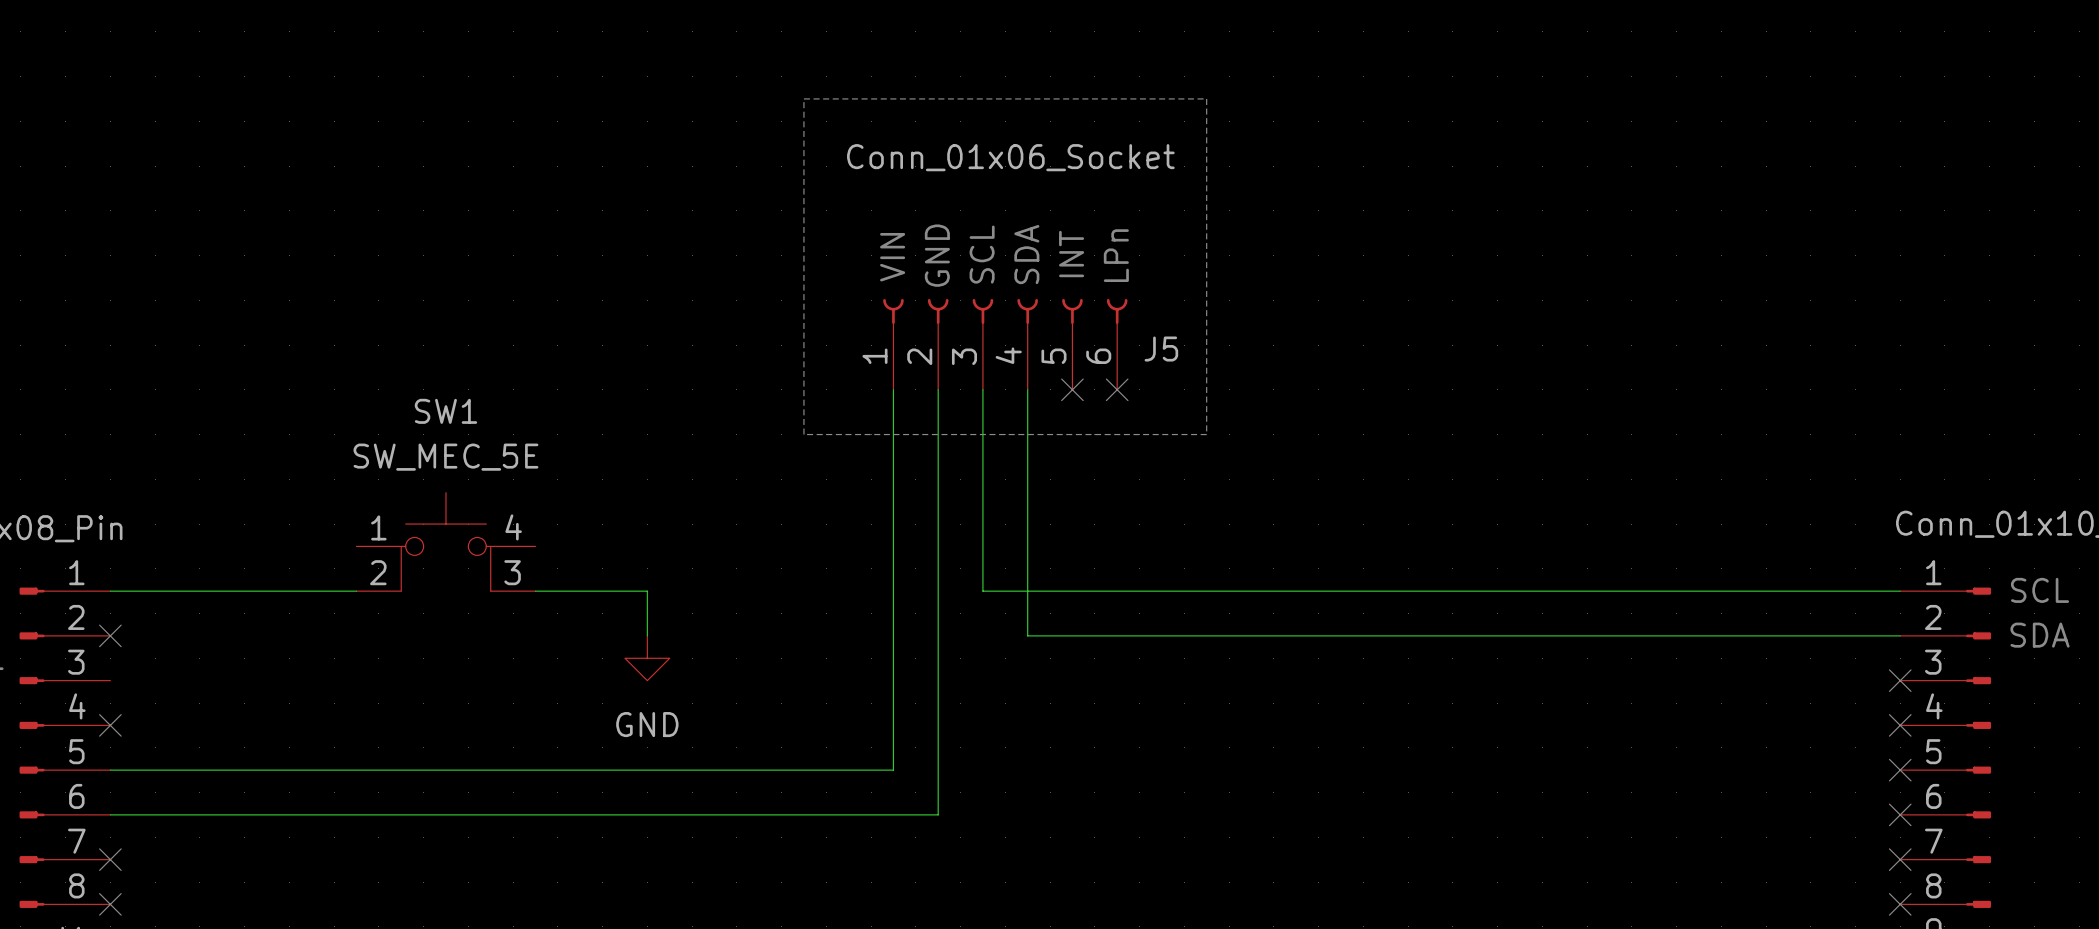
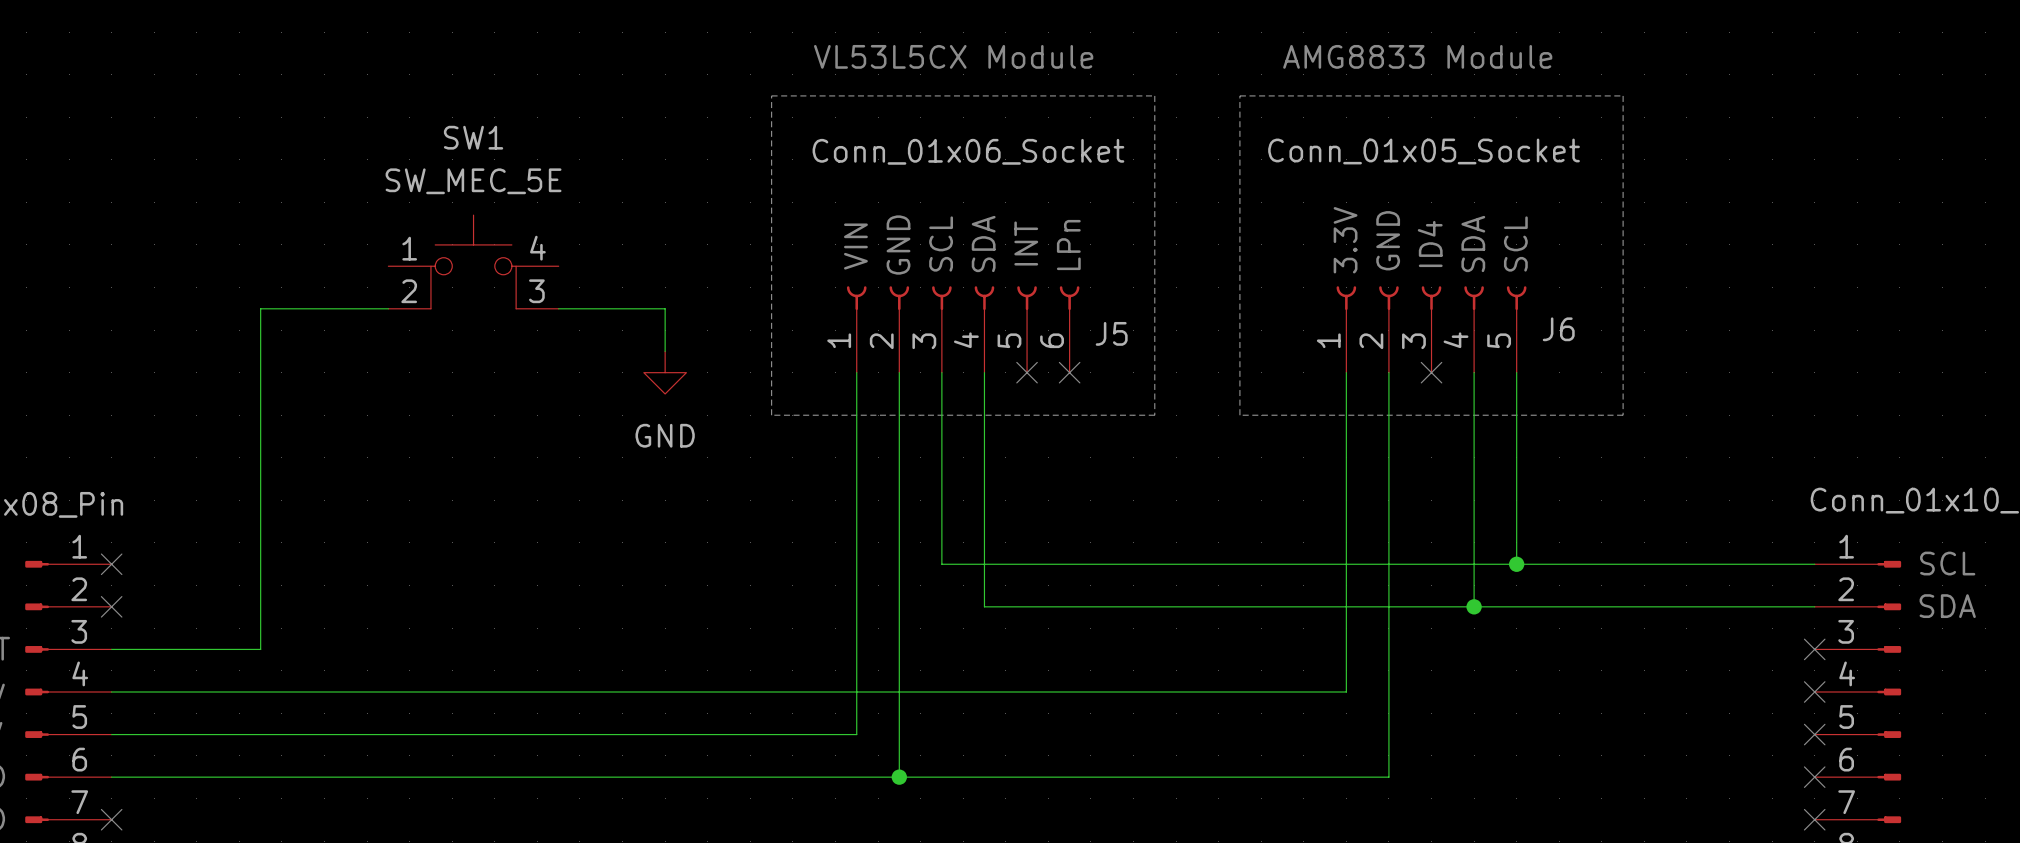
text: none -> VL53L5CX Module (953, 56)
text: none -> AMG8833 Module (1417, 56)
line: none -> (1239, 95) (1623, 95) (1623, 415) (1239, 415) (1239, 95)
text: none -> 3.3V (1345, 240)
text: none -> GND (1388, 240)
text: none -> ID4 (1430, 243)
text: none -> SDA (1473, 243)
text: none -> SCL (1515, 243)
wire: none -> (388, 308) (260, 308) (260, 649) (111, 649)
J6: none -> Conn_01x05_Socket (1431, 329)
wire: none -> (1346, 372) (1346, 691) (111, 691)
wire: none -> (1388, 372) (1388, 777) (899, 777)
no-connect mark: none -> (1431, 372)
wire: none -> (1474, 372) (1474, 606)
wire: none -> (1516, 372) (1516, 564)
SW1 position: (445, 541) -> (473, 261)
wire: (110, 591) (356, 591) -> none
no-connect mark: none -> (111, 564)
wire: (535, 591) (647, 591) (647, 635) -> (558, 308) (665, 308) (665, 351)
junction: none -> (1516, 564)
junction: none -> (1474, 606)
power symbol position: GND (647, 658) -> GND (665, 372)
no-connect mark: (110, 725) -> none
junction: none -> (899, 777)

